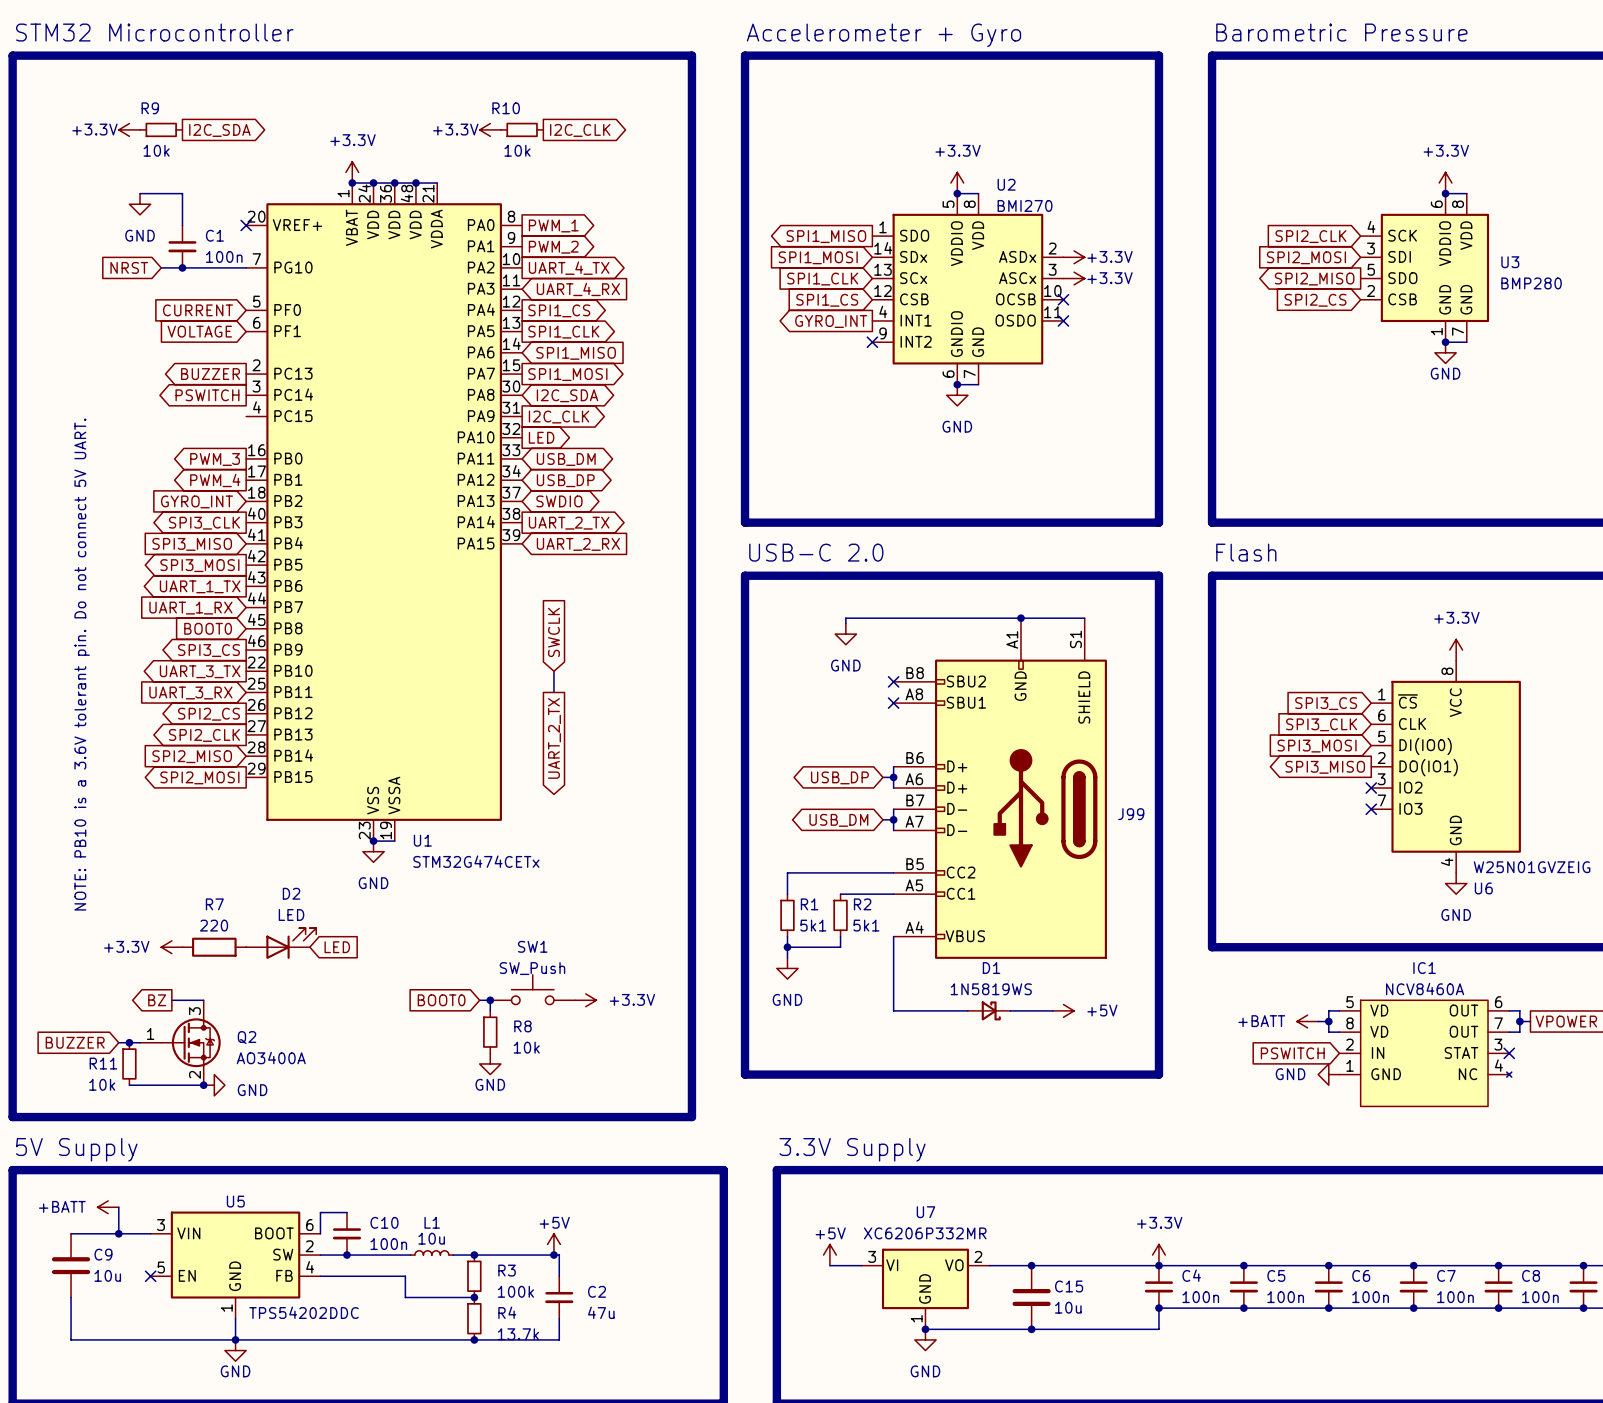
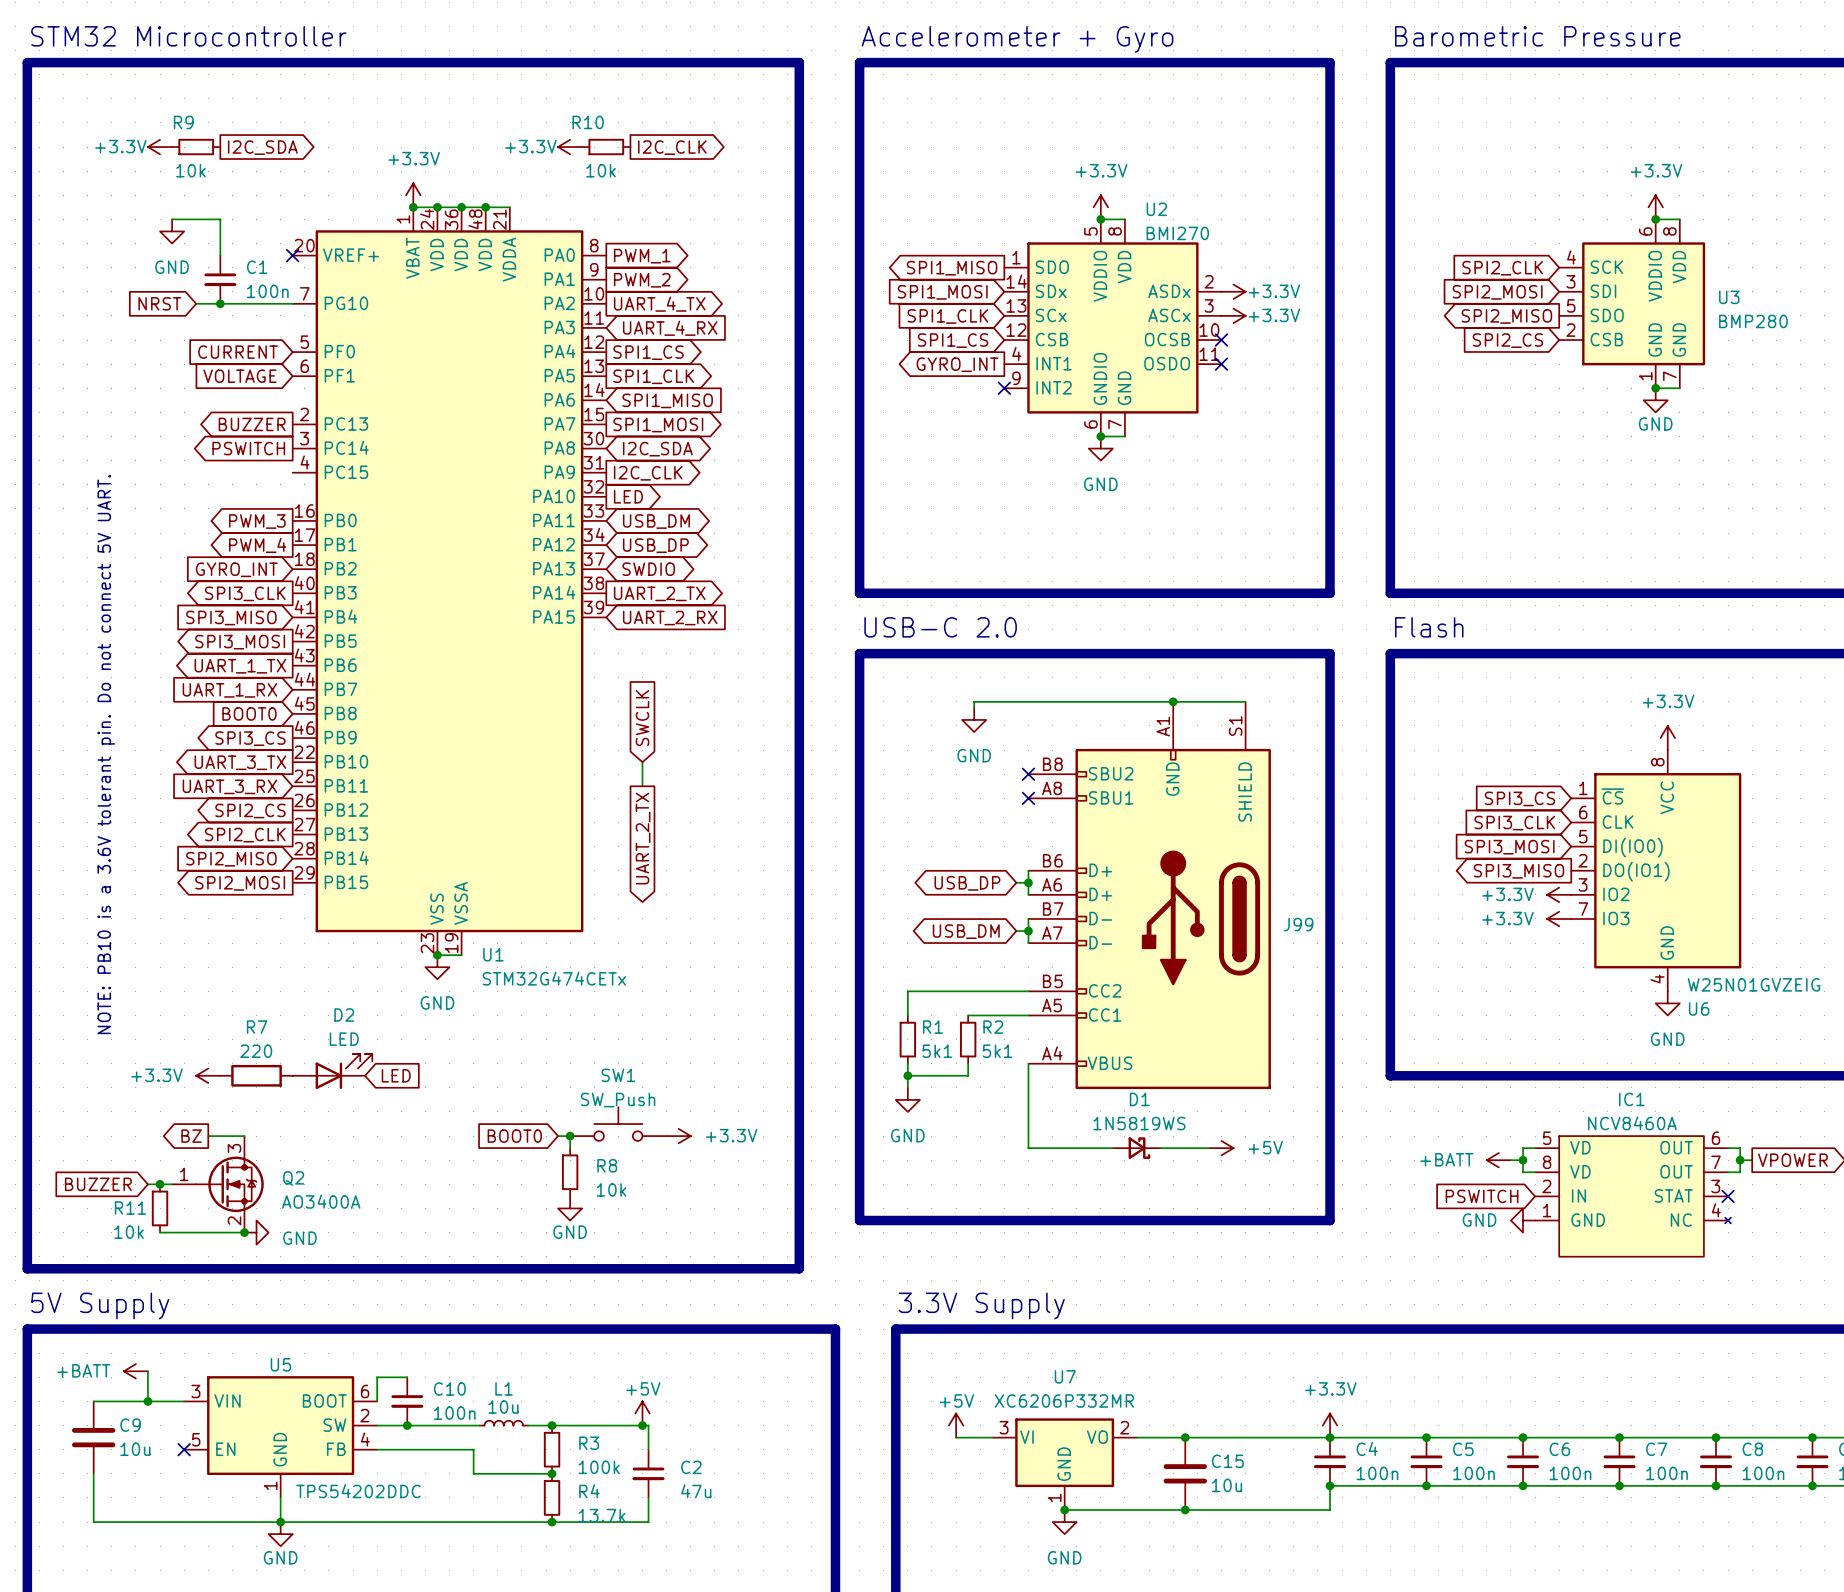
power symbol: none -> +3.3V (1559, 894)
no-connect mark: (1371, 788) -> none
power symbol: none -> +3.3V (1559, 918)
no-connect mark: (1371, 809) -> none

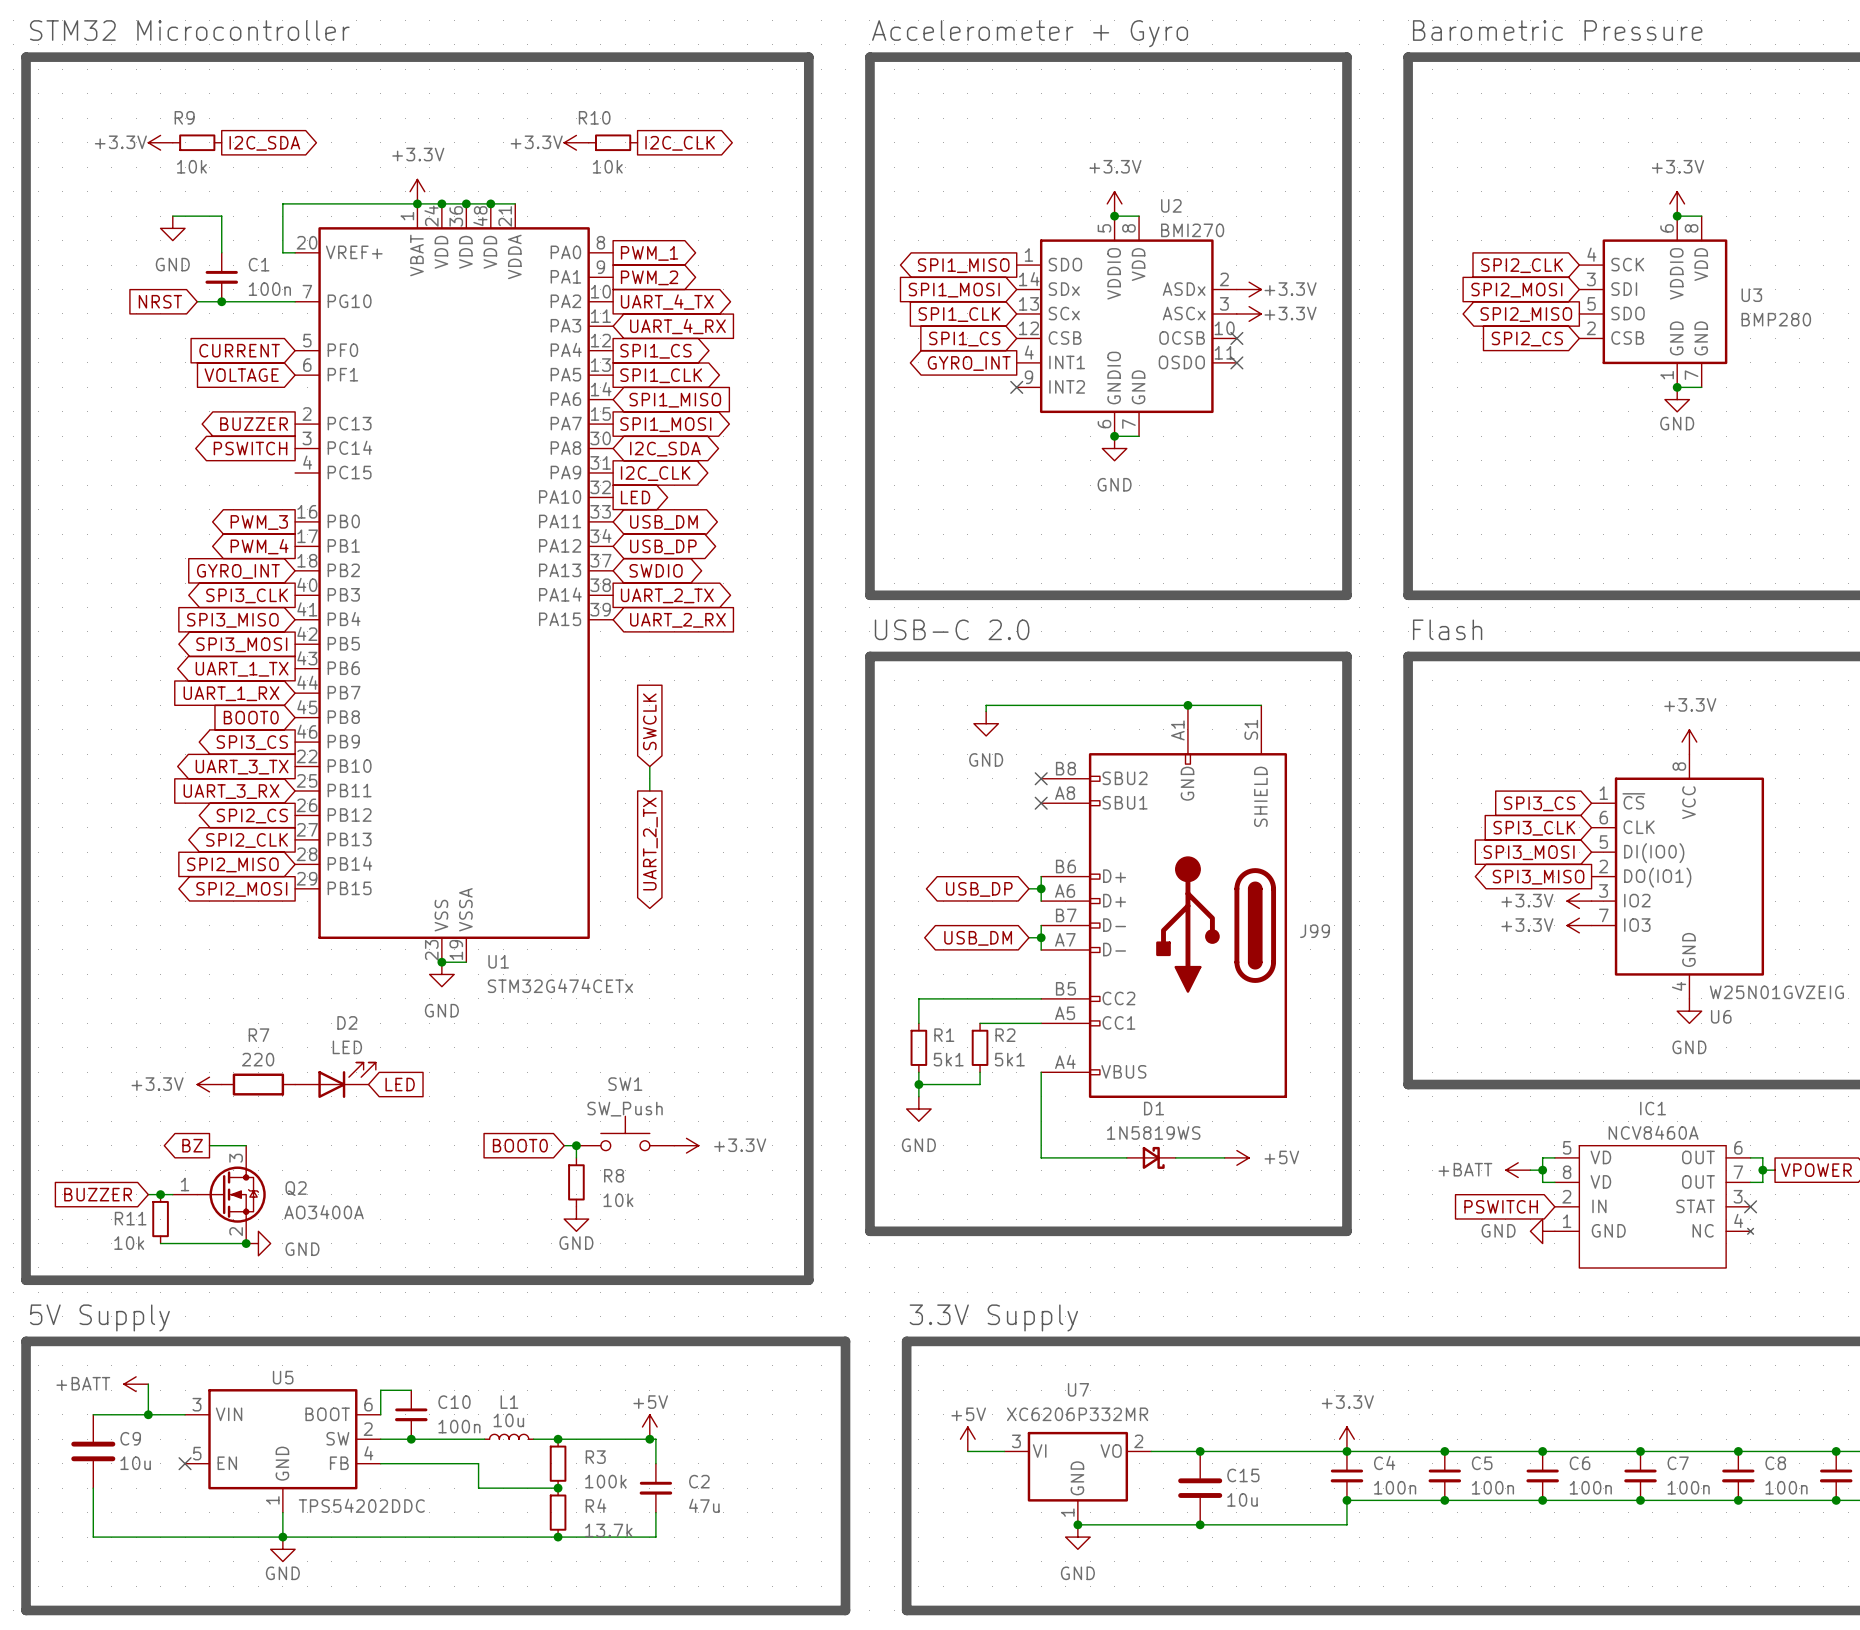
wire: none -> (417, 203) (282, 203) (282, 252) (295, 252)
no-connect mark: (292, 255) -> none
text: NOTE: PB10 is a 3.6V tolerant pin. Do not connect 5V UART. (106, 754) -> none

